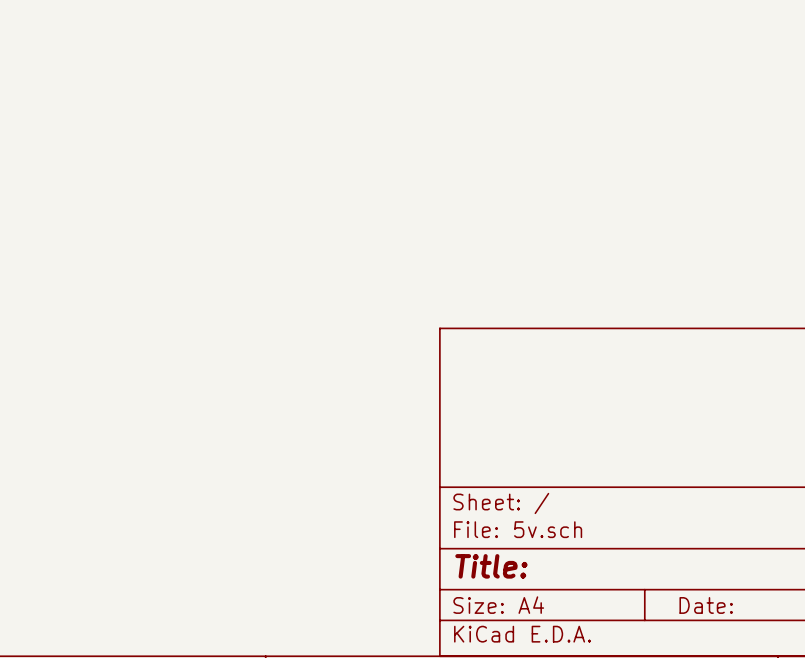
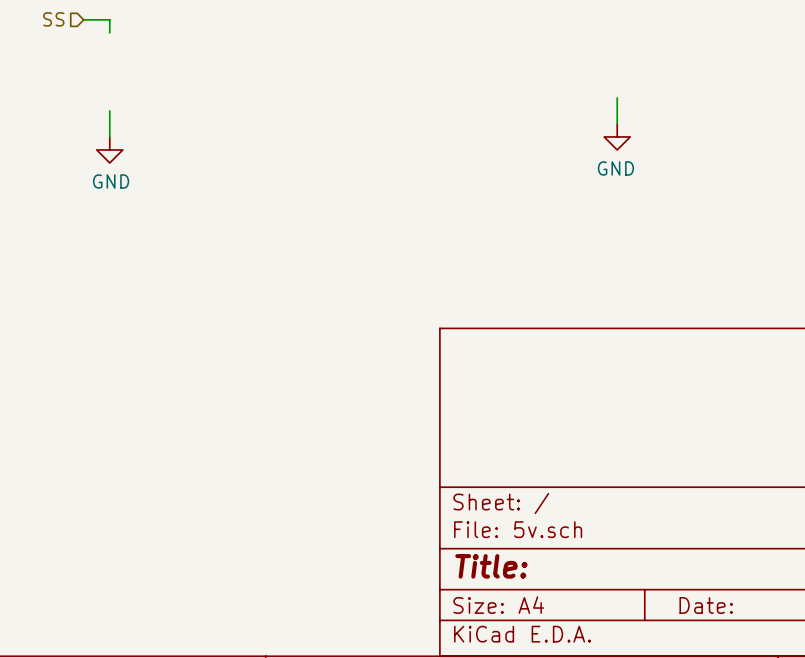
hierarchical label: none -> SS (53, 19)
wire: none -> (83, 19) (109, 19) (109, 32)
wire: none -> (617, 97) (617, 123)
wire: none -> (109, 110) (109, 136)
power symbol: none -> GND (617, 136)
power symbol: none -> GND (109, 149)

